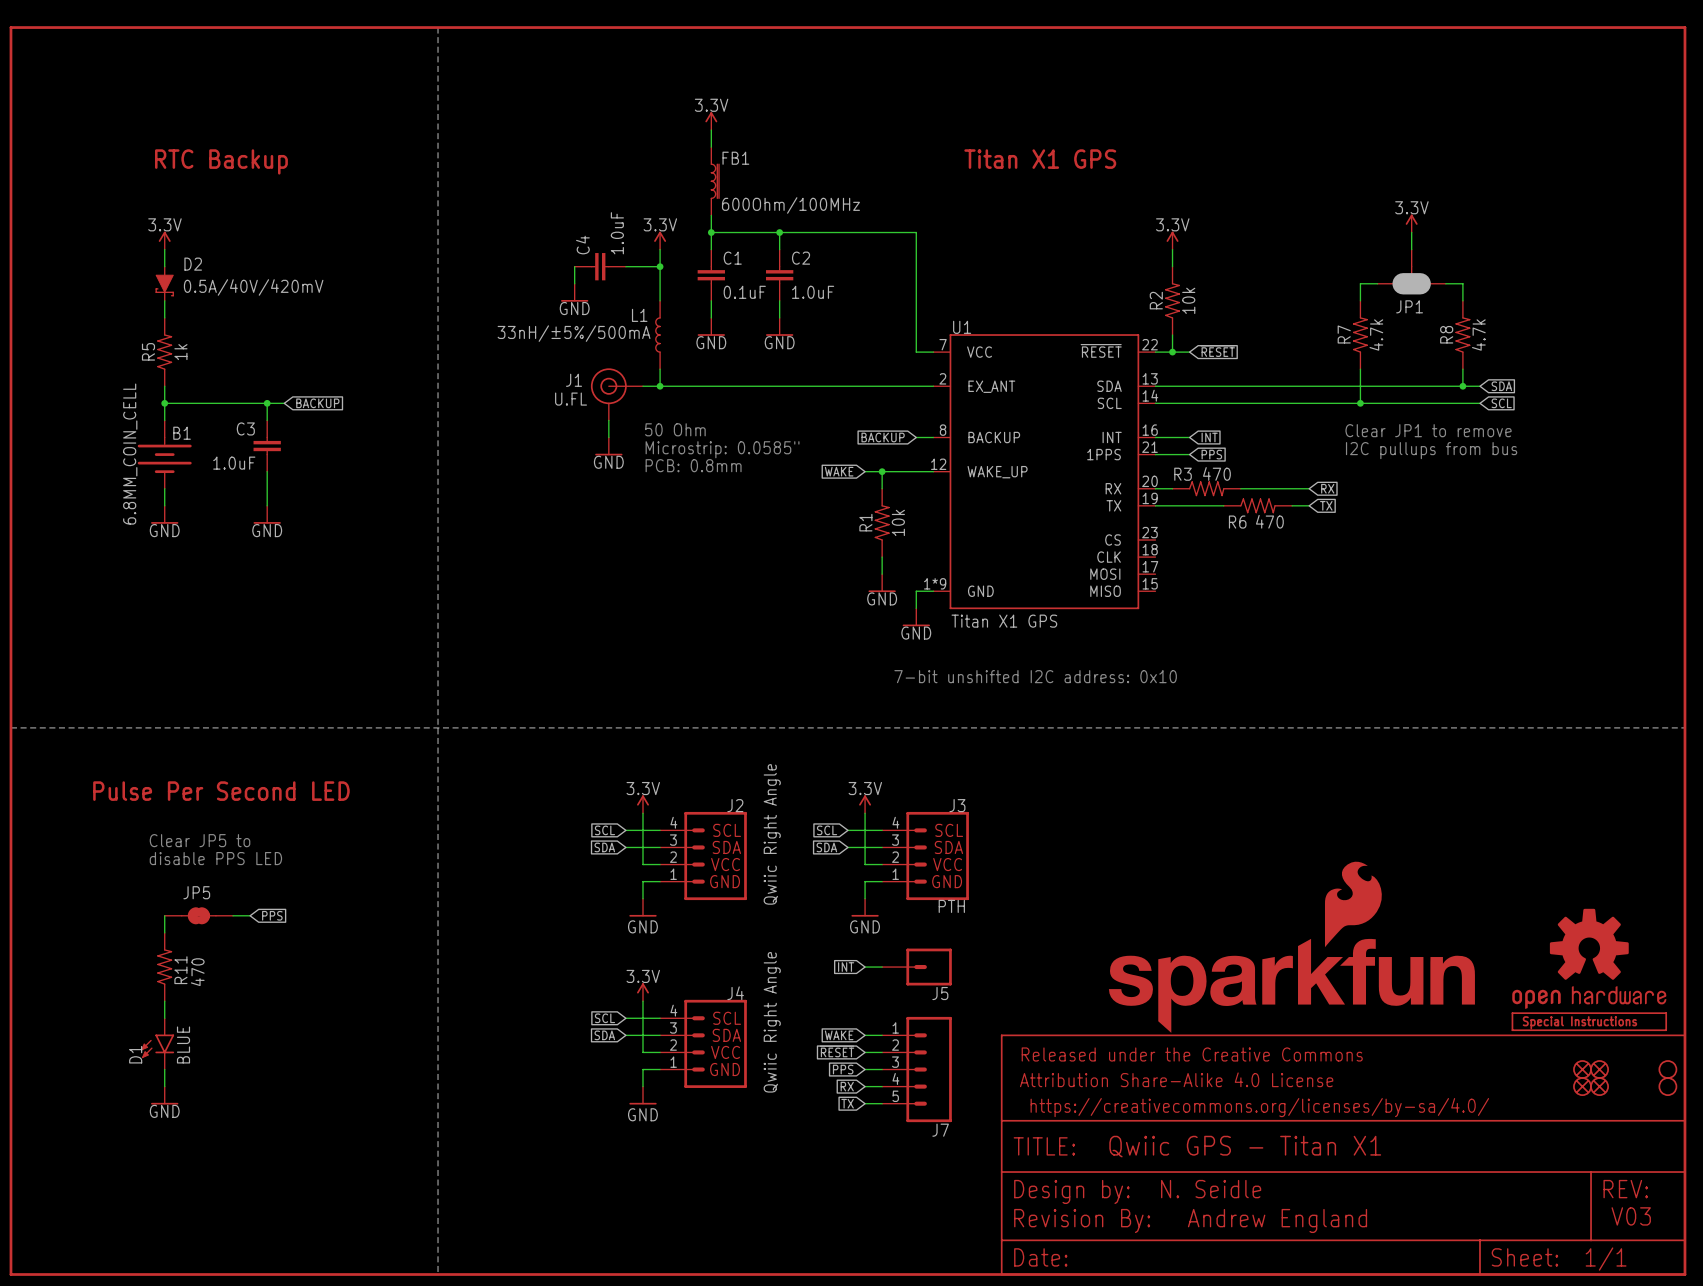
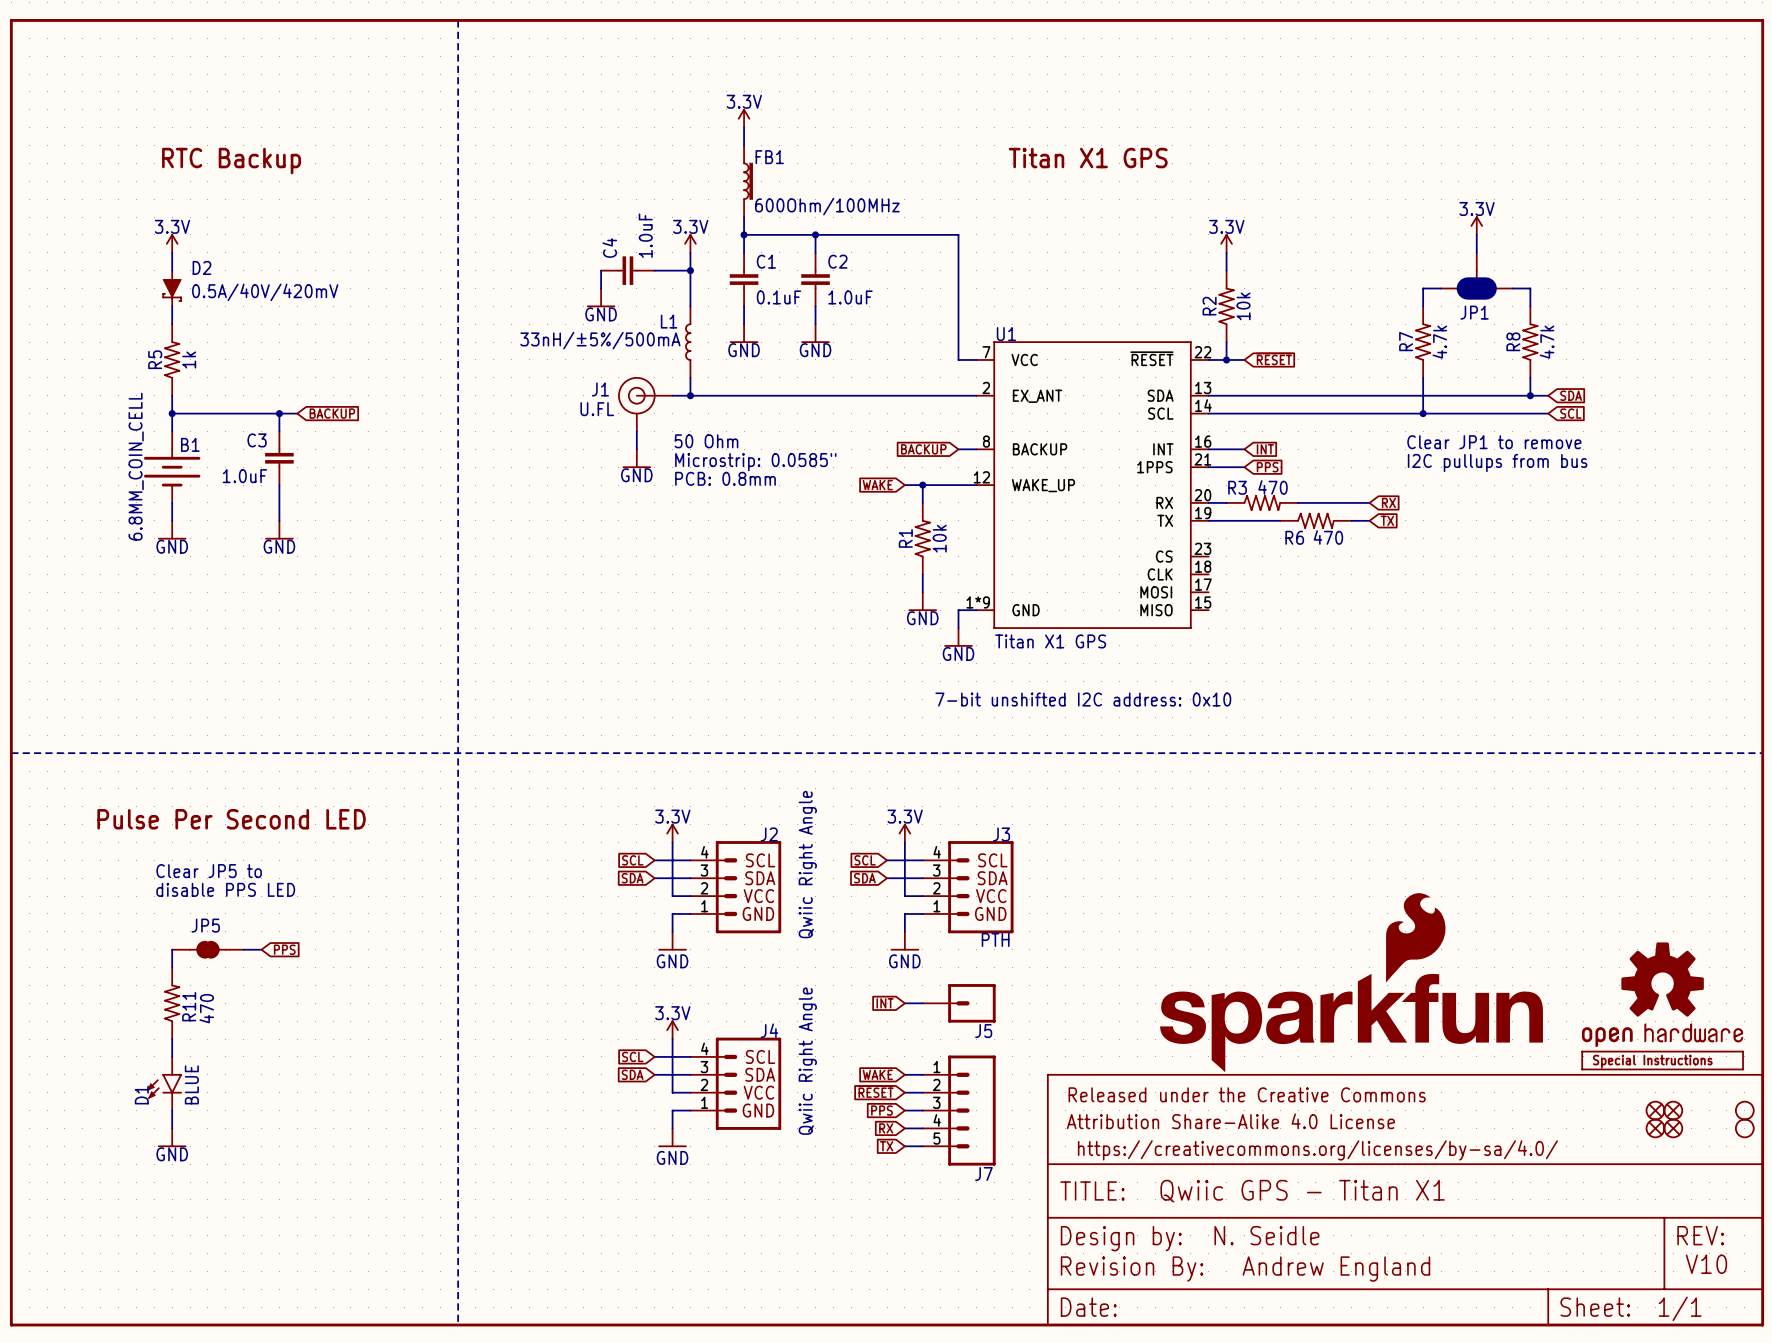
text: V03 (1631, 1216) -> V10 (1706, 1264)

